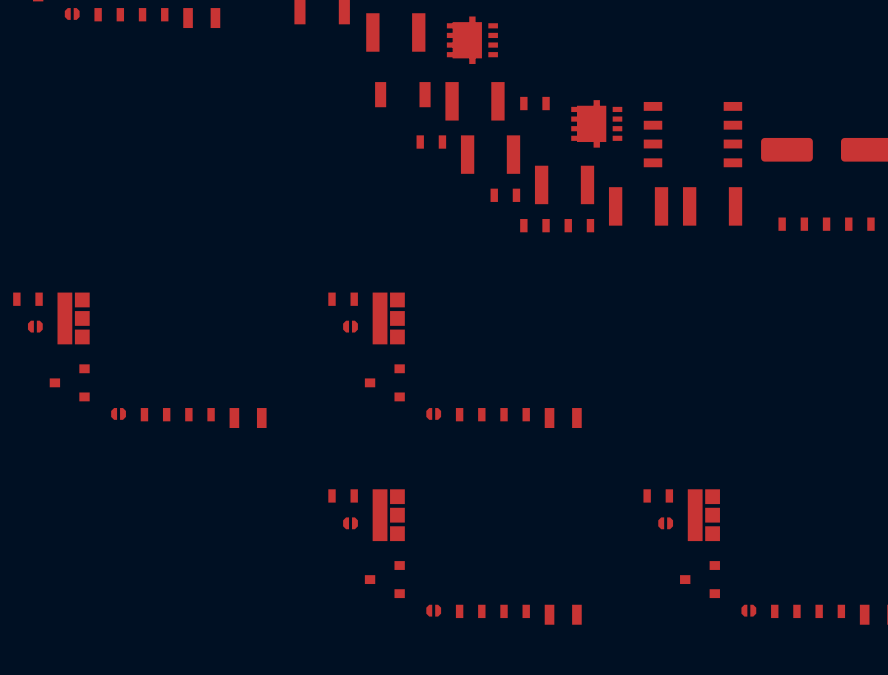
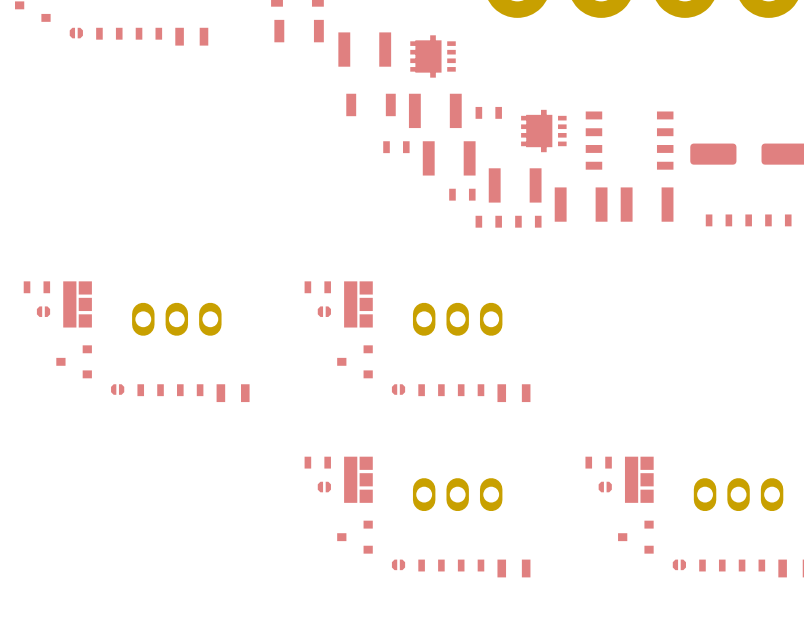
part: none -> (176, 319)
part: none -> (457, 319)
part: none -> (457, 494)
part: none -> (738, 494)

